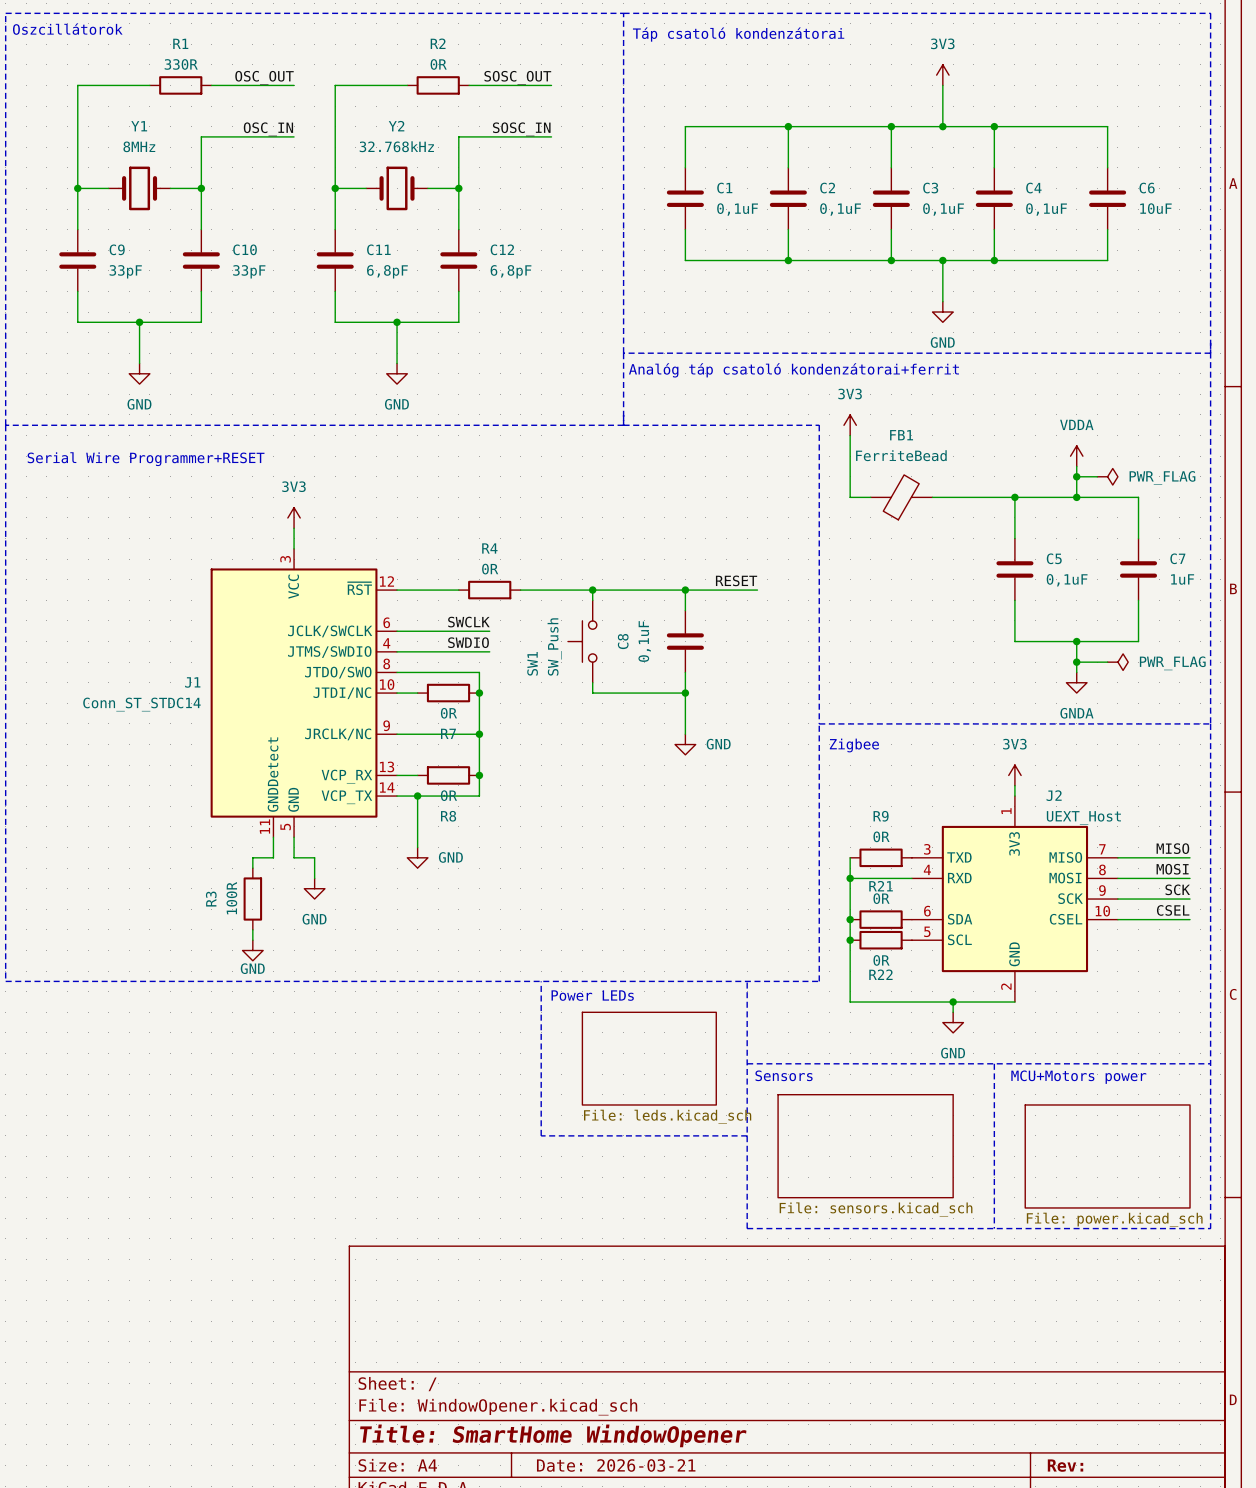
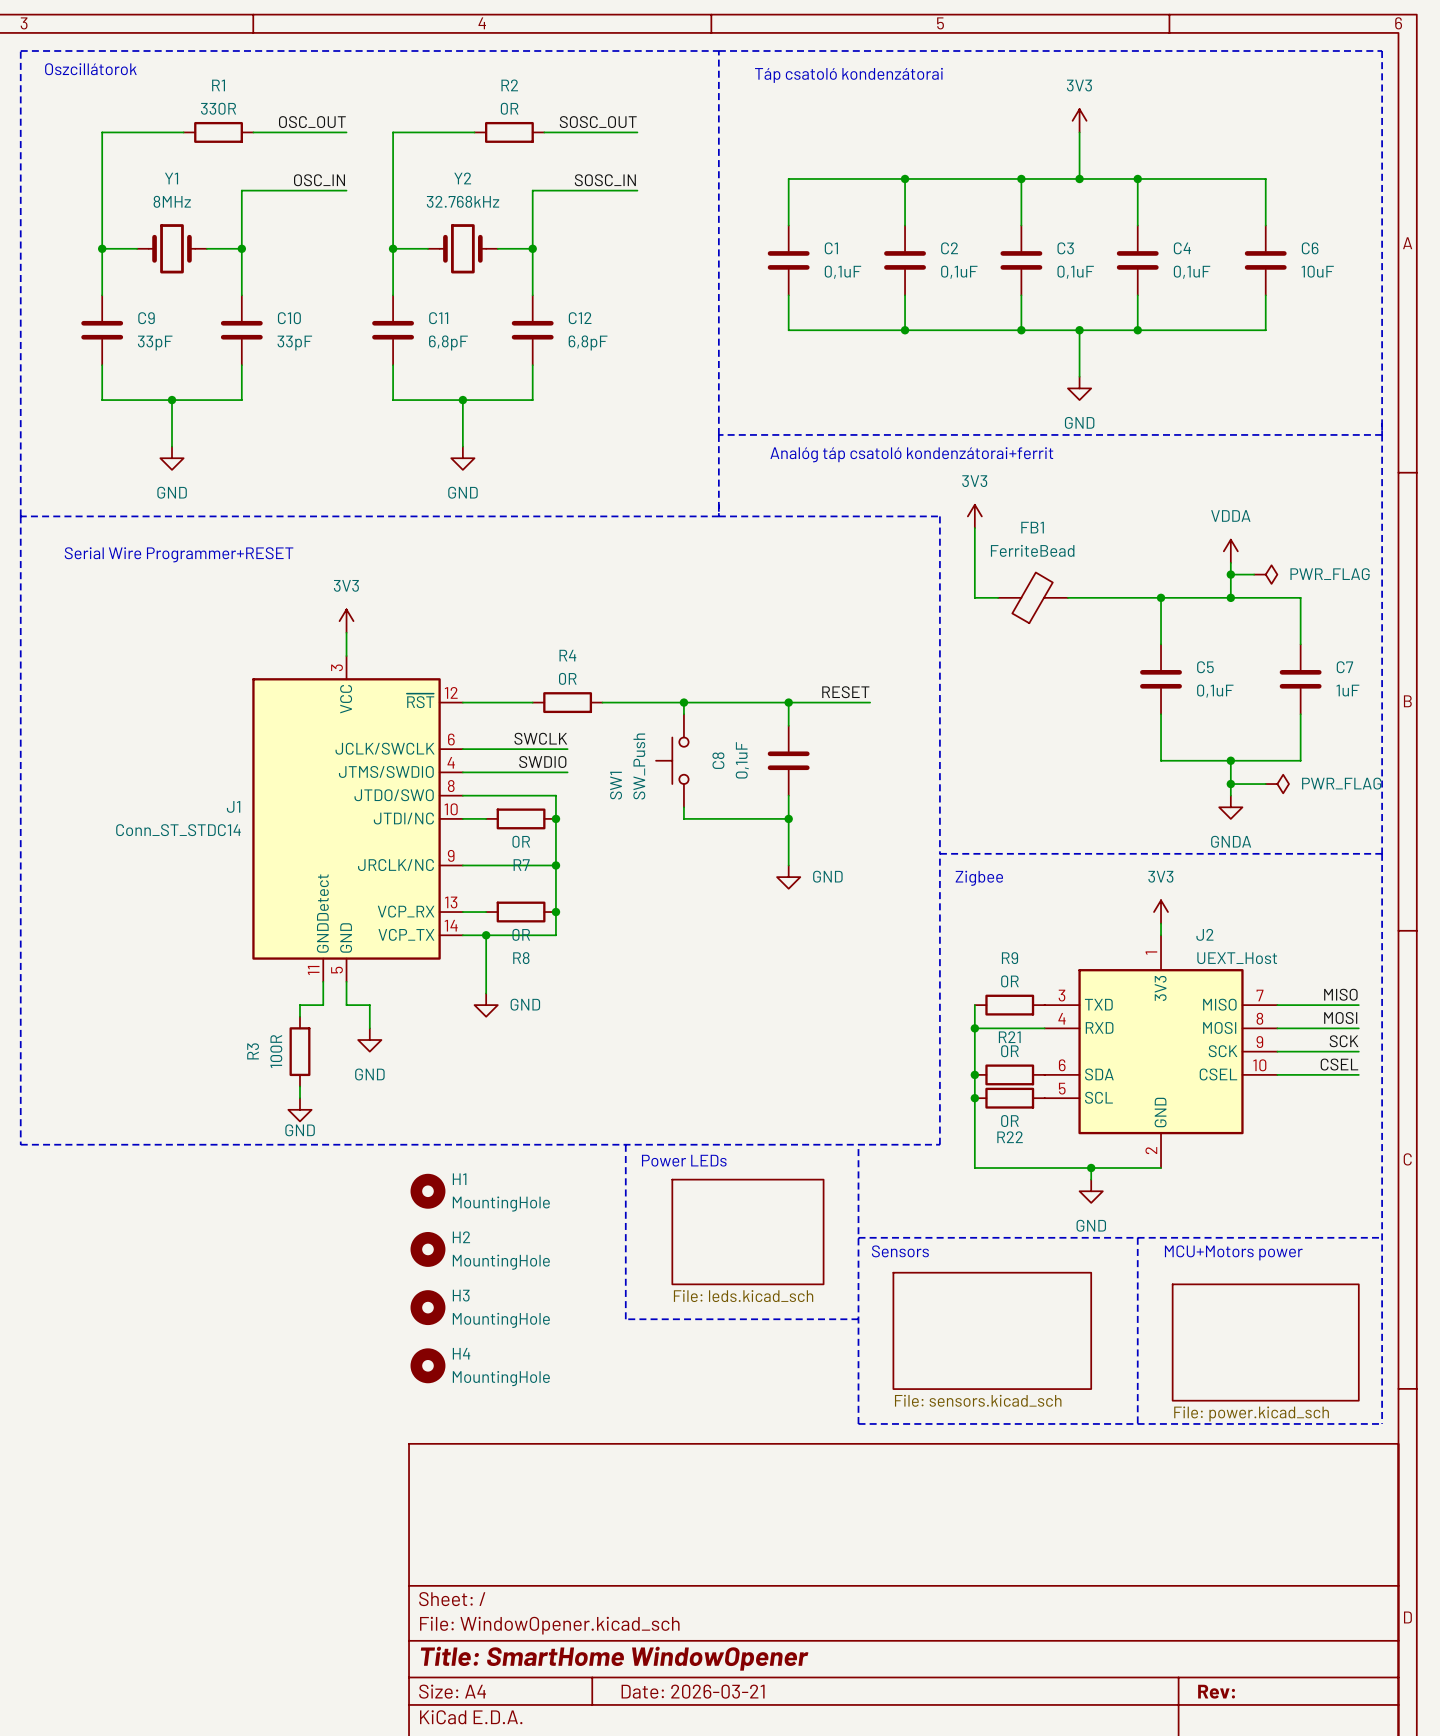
H1: none -> MountingHole (427, 1191)
H2: none -> MountingHole (427, 1249)
H3: none -> MountingHole (427, 1307)
H4: none -> MountingHole (427, 1365)

